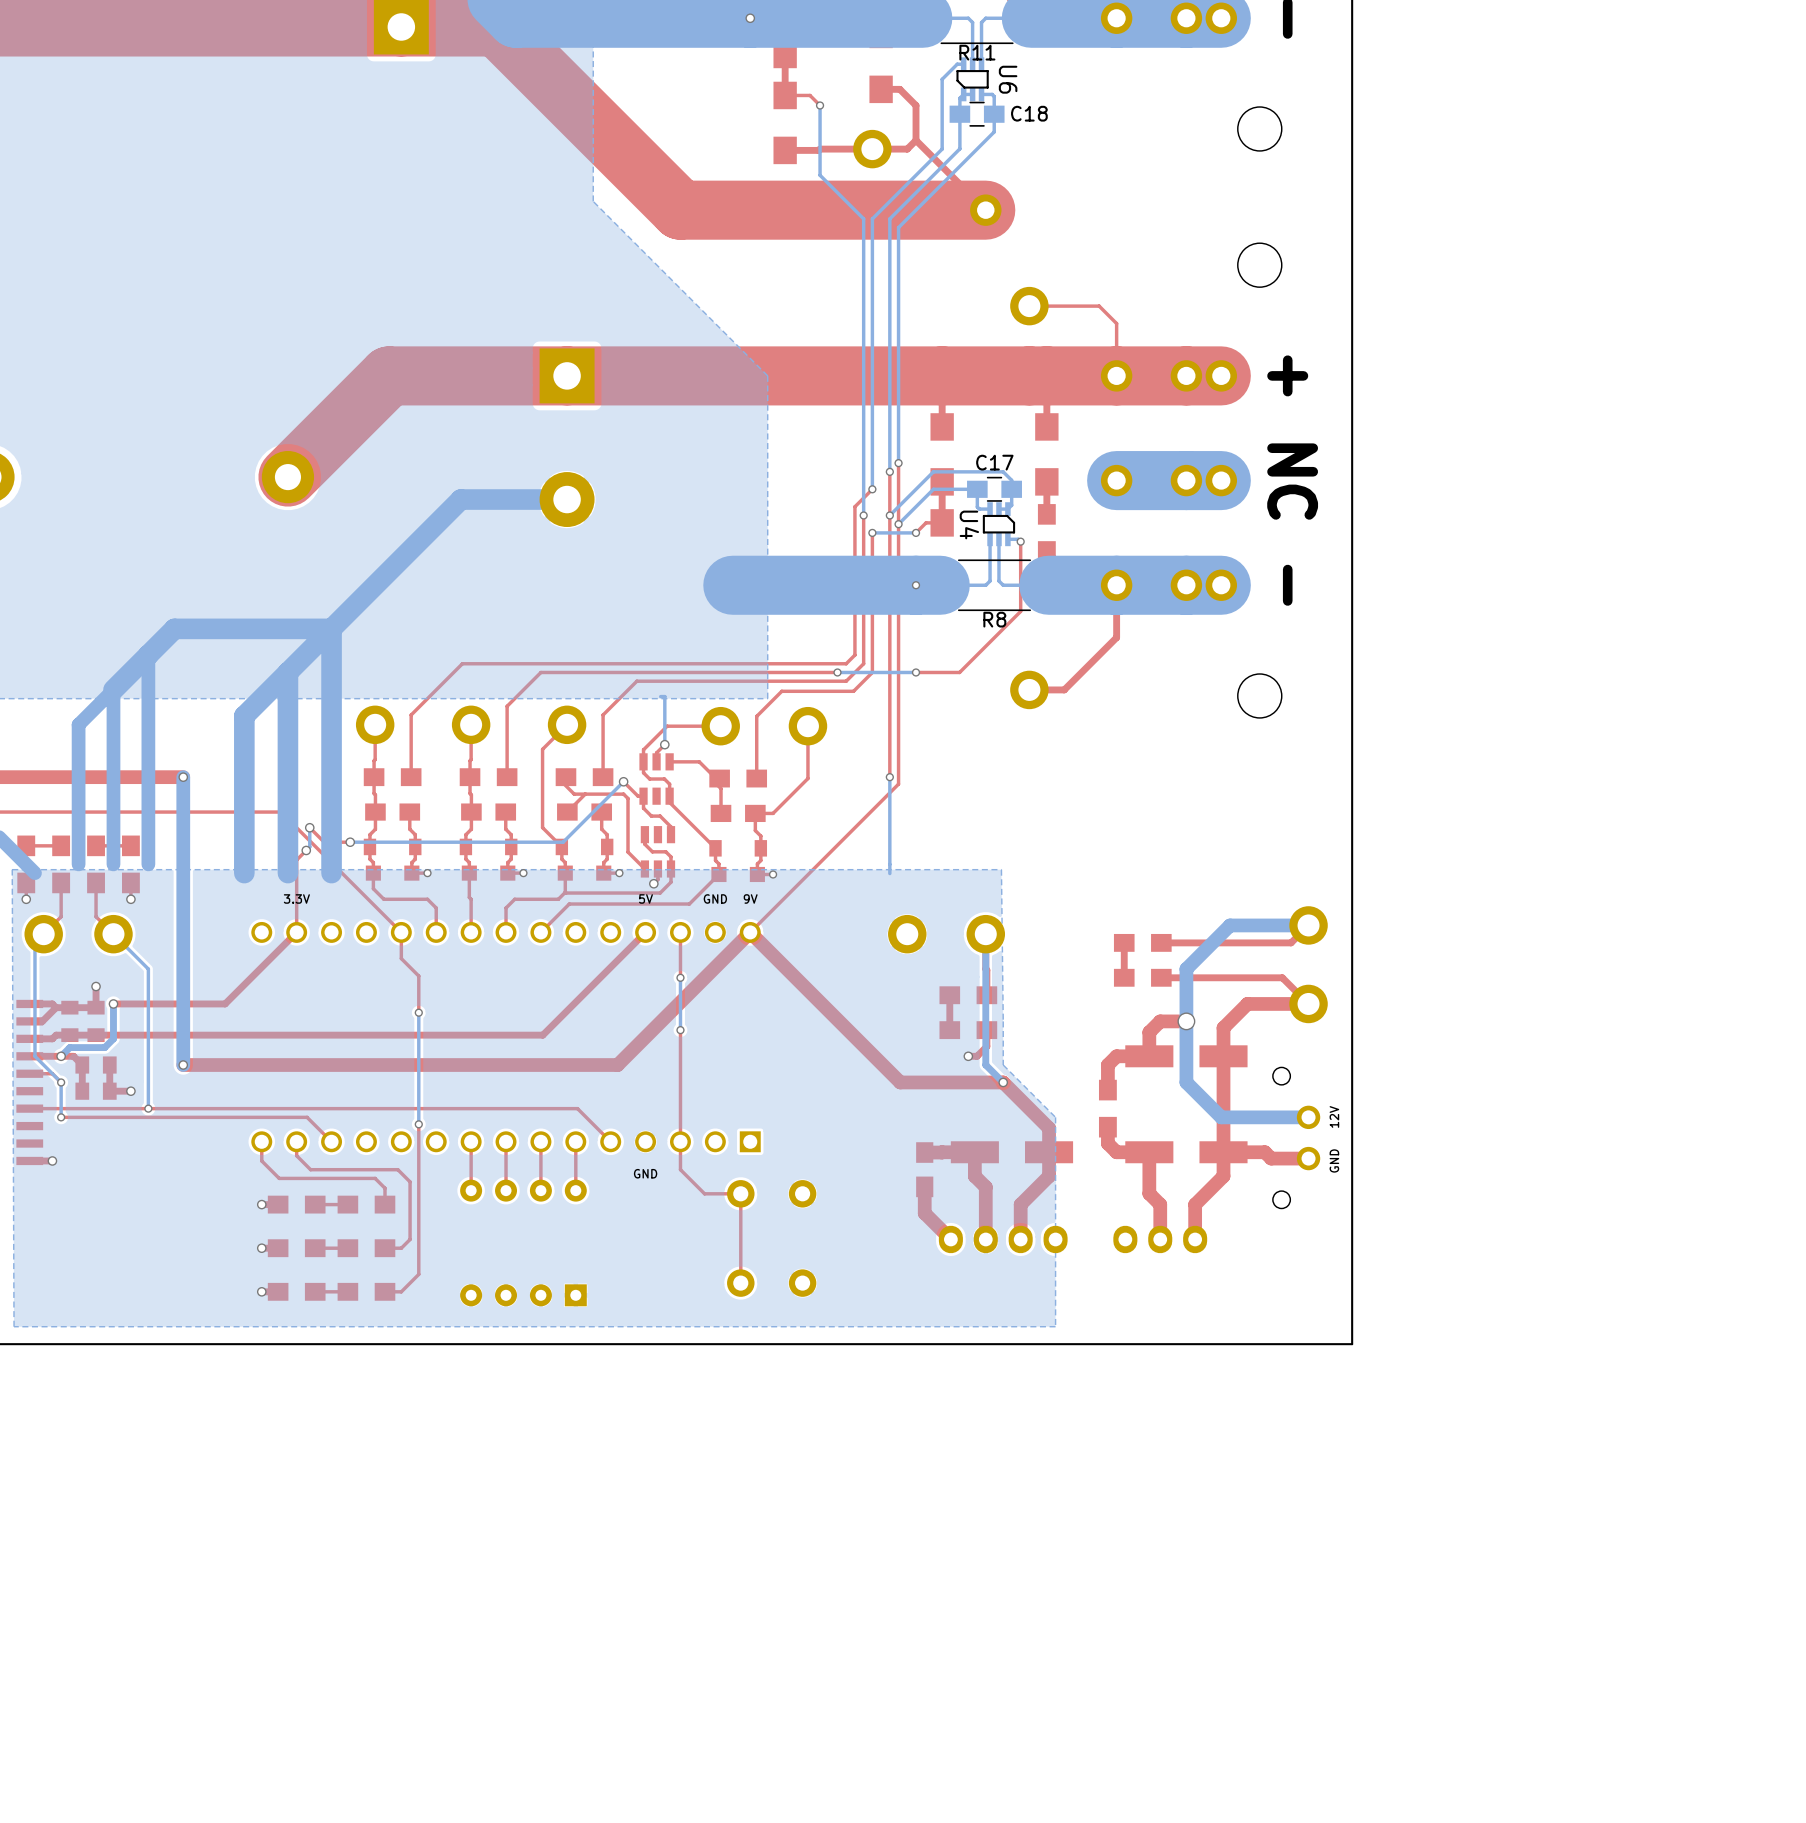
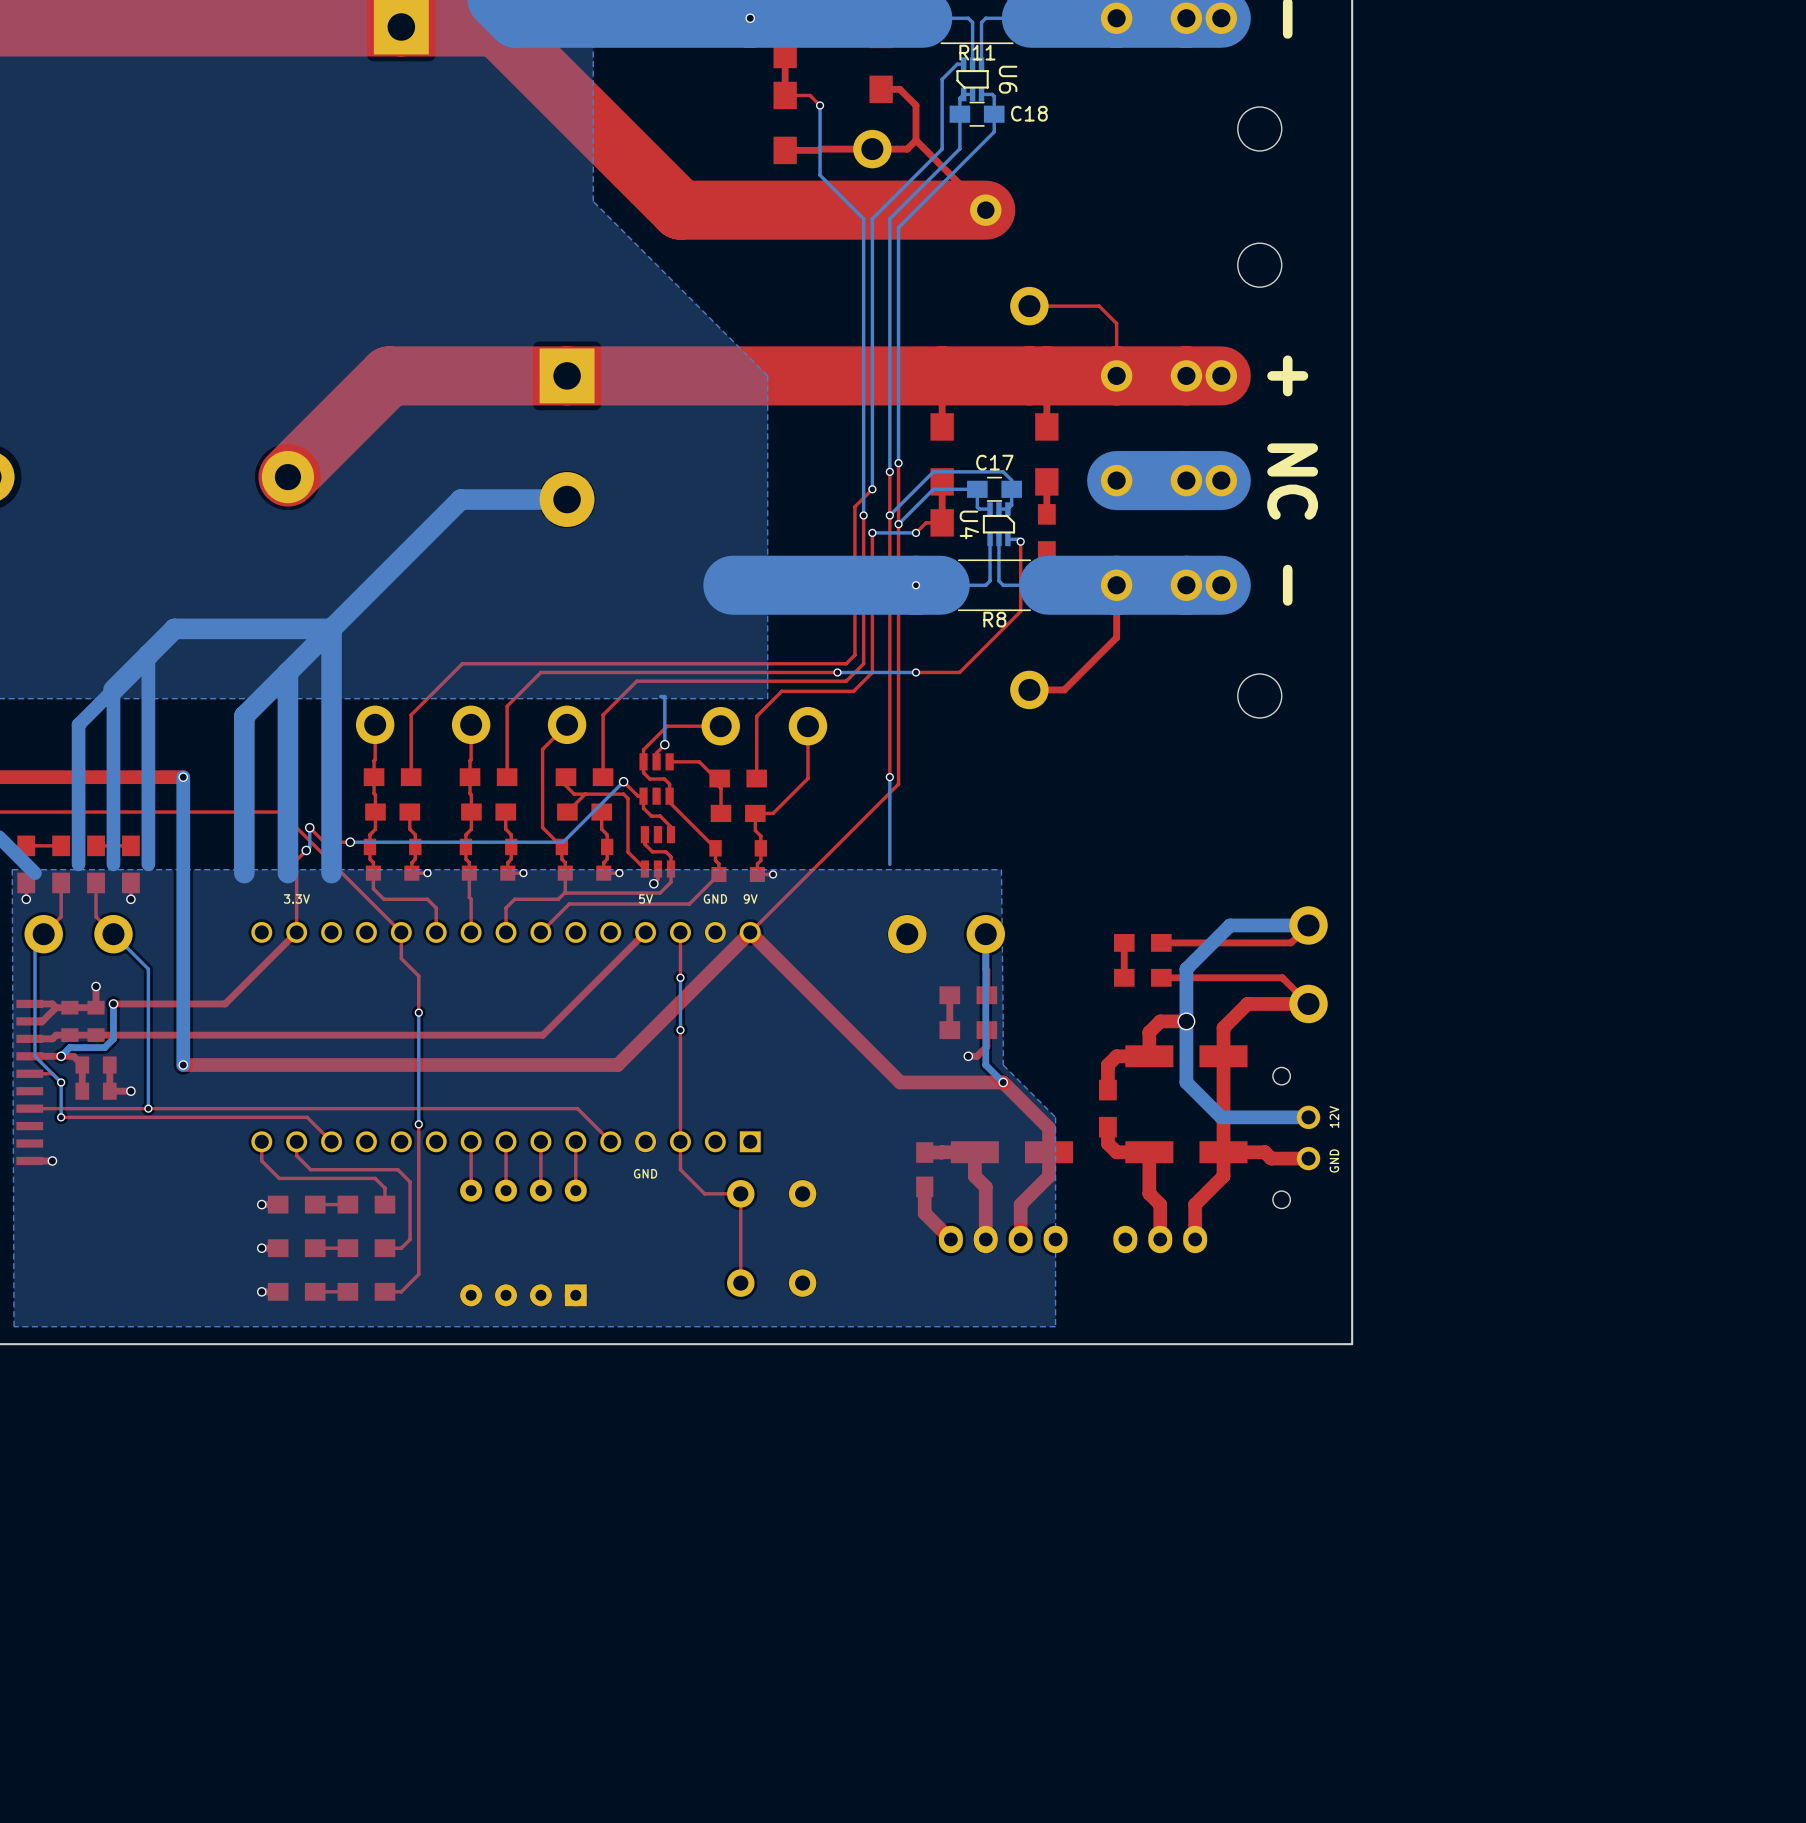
bottom track: (889, 864) (889, 873) -> none

